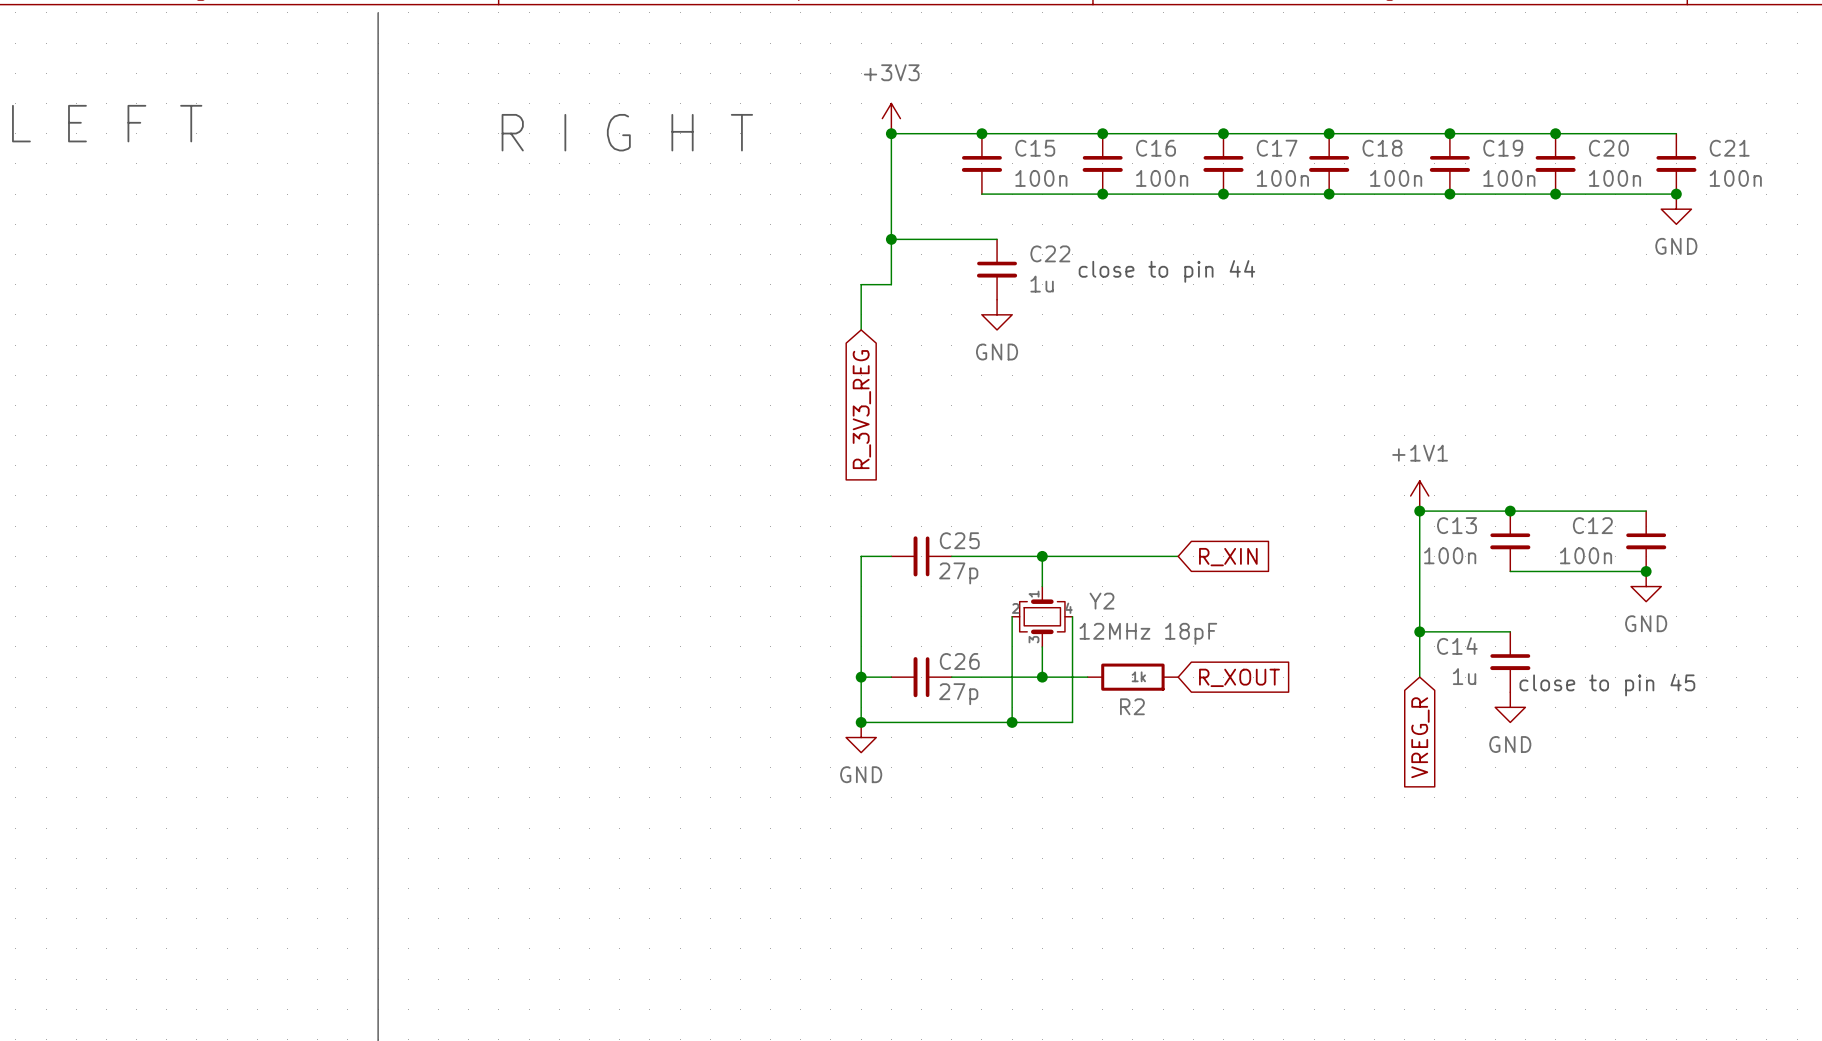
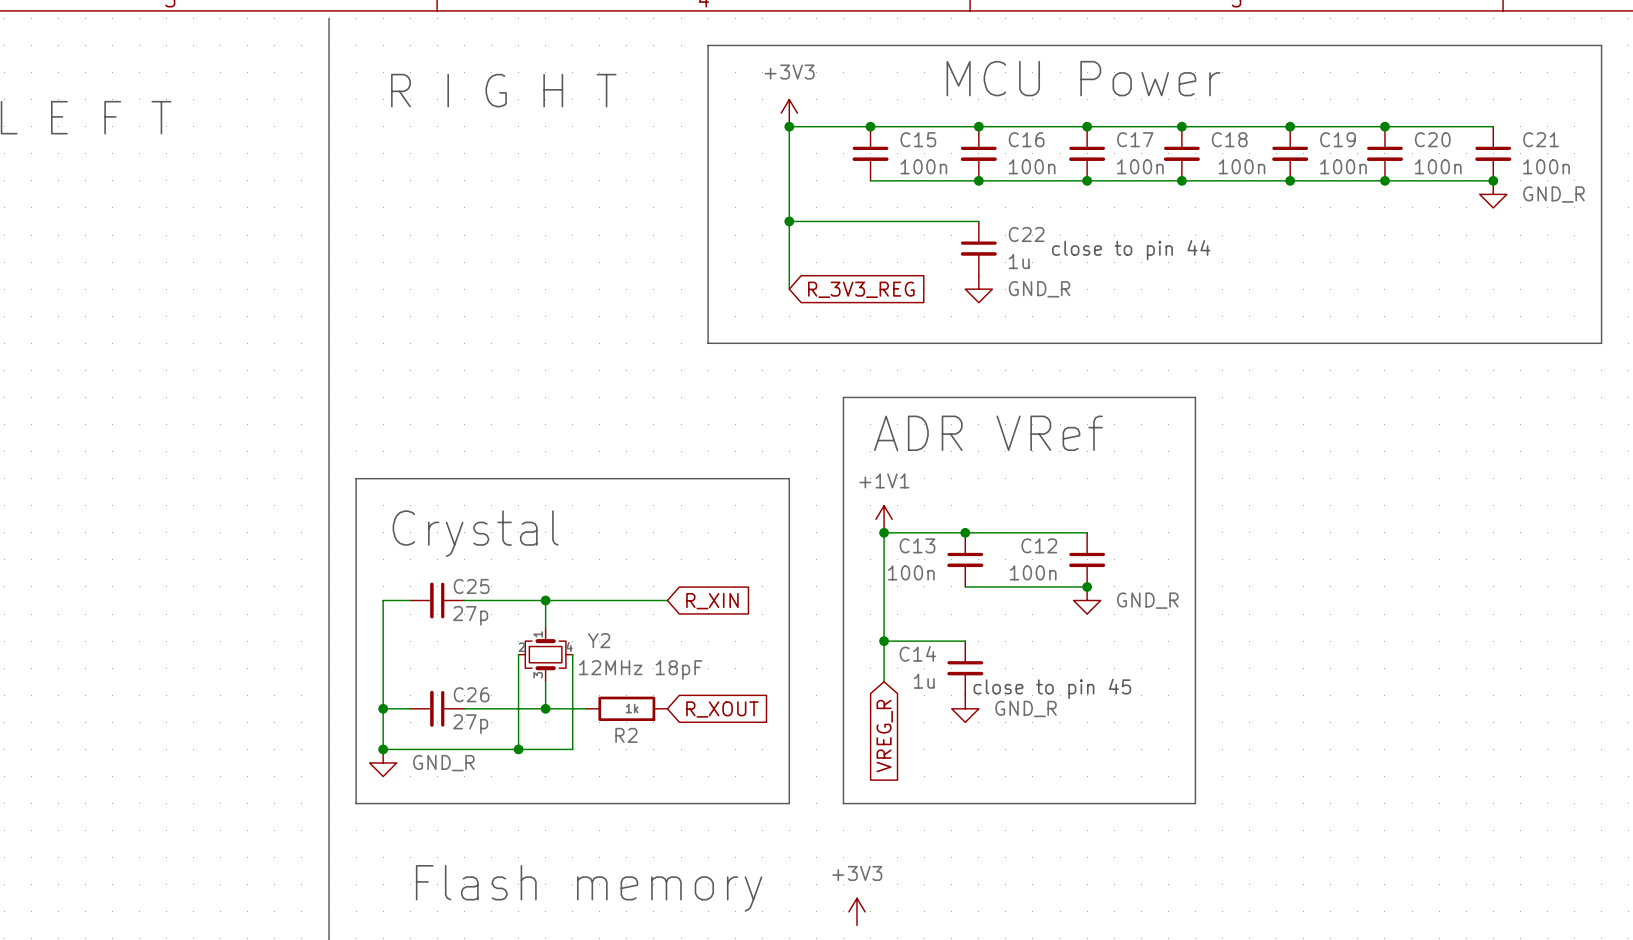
line: none -> (708, 45) (1601, 45) (1601, 343) (708, 343) (708, 45)
text: none -> MCU Power (1083, 78)
text position: R I G H T (627, 132) -> R I G H T (503, 90)
power symbol: GND (1676, 209) -> GND_R (1493, 194)
wire: none -> (884, 221) (978, 221)
C22 position: (997, 269) -> (978, 248)
text position: close to pin 44 (1166, 271) -> close to pin 44 (1131, 250)
wire: (891, 284) (861, 284) (861, 329) -> (789, 262) (789, 289)
power symbol: GND (997, 314) -> none
power symbol: none -> GND_R (978, 289)
global label rotation: 0° (861, 409) -> 90° counterclockwise (861, 289)
line: none -> (843, 397) (1195, 397) (1195, 803) (843, 803) (843, 397)
text: none -> ADR VRef (988, 433)
power symbol: +1V1 (1419, 495) -> none
junction: (1419, 511) -> none
junction: (1510, 511) -> none
wire: (1646, 511) (1419, 511) (1419, 677) -> none
line: none -> (356, 478) (789, 478) (789, 803) (356, 803) (356, 478)
C13 position: (1510, 541) -> (965, 559)
C12 position: (1646, 541) -> (1087, 559)
wire: (891, 556) (861, 556) (861, 722) (1072, 722) (1072, 616) -> none
C25 position: (921, 556) -> (437, 600)
wire: (951, 556) (1178, 556) -> none
wire: (1042, 556) (1042, 586) -> none
junction: (1042, 556) -> none
global label: R_XIN (1228, 557) -> none
power symbol: none -> +1V1 (884, 519)
wire: (1510, 571) (1646, 571) -> none
junction: (1646, 571) -> none
junction: none -> (884, 532)
junction: none -> (965, 532)
wire: none -> (1087, 532) (884, 532) (884, 681)
power symbol: GND (1646, 586) -> none
text: none -> Crystal (475, 533)
wire: (1012, 616) (1012, 722) -> none
Y2 position: (1042, 616) -> (545, 654)
wire: (1419, 631) (1510, 631) -> none
junction: (1419, 631) -> none
wire: (1042, 646) (1042, 677) -> none
junction: none -> (1087, 586)
wire: none -> (410, 600) (383, 600) (383, 749) (572, 749) (572, 654)
wire: none -> (464, 600) (667, 600)
wire: none -> (545, 600) (545, 627)
junction: none -> (545, 600)
global label: none -> R_XIN (712, 601)
power symbol: none -> GND_R (1087, 600)
C14 position: (1510, 662) -> (965, 668)
wire: (861, 677) (891, 677) -> none
junction: (861, 677) -> none
C26 position: (921, 677) -> (437, 708)
wire: (951, 677) (1087, 677) -> (965, 586) (1087, 586)
junction: (1042, 677) -> none
R2 position: (1132, 677) -> (626, 708)
global label: R_XOUT (1239, 677) -> none
text: close to pin 45 (1607, 685) -> none
wire: none -> (884, 641) (965, 641)
power symbol: GND (1510, 707) -> none
wire: none -> (518, 654) (518, 749)
junction: (861, 722) -> none
junction position: (1012, 722) -> (884, 641)
power symbol: GND (861, 737) -> none
global label: VREG_R (1420, 737) -> none
wire: none -> (545, 681) (545, 708)
text: none -> close to pin 45 (1052, 688)
wire: none -> (383, 708) (410, 708)
junction: none -> (383, 708)
wire: none -> (464, 708) (586, 708)
junction: none -> (545, 708)
power symbol: none -> GND_R (965, 708)
global label: none -> R_XOUT (722, 709)
global label: none -> VREG_R (884, 736)
junction: none -> (383, 749)
junction: none -> (518, 749)
power symbol: none -> GND_R (383, 762)
text: none -> Flash memory (589, 888)
power symbol: none -> +3V3 (856, 911)

